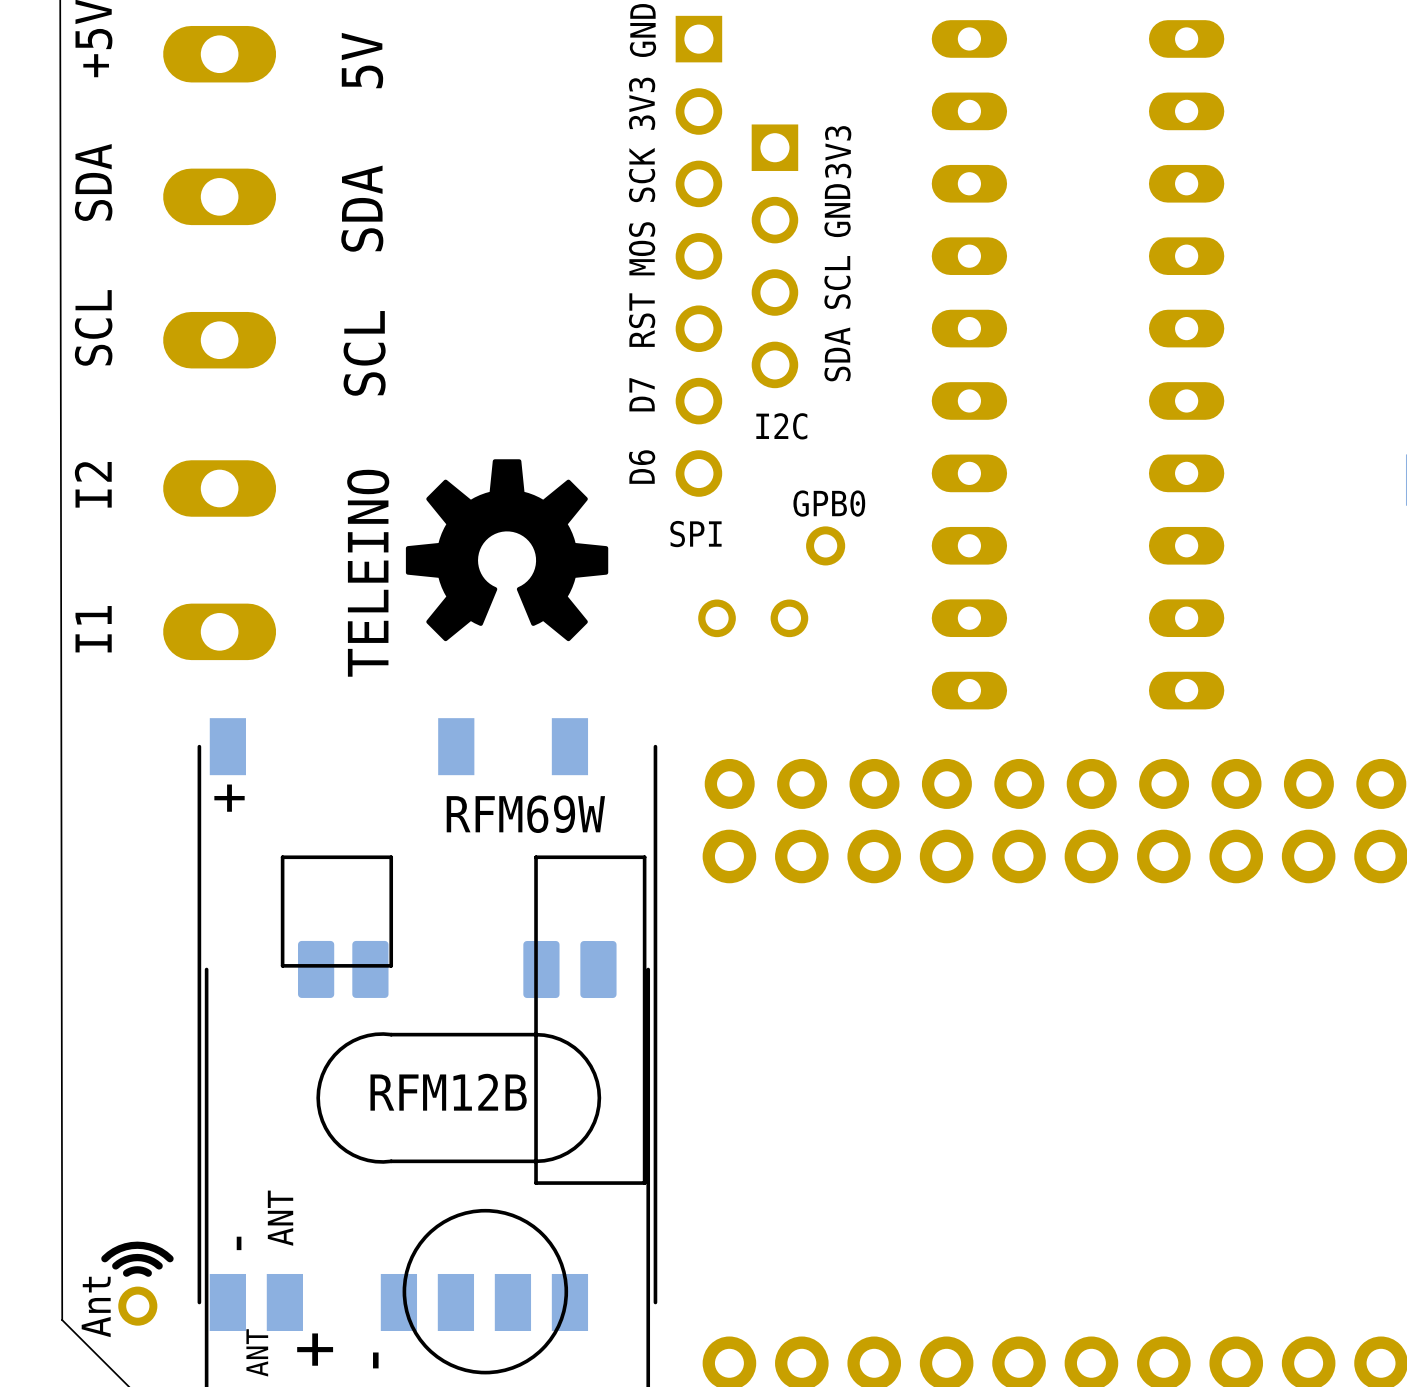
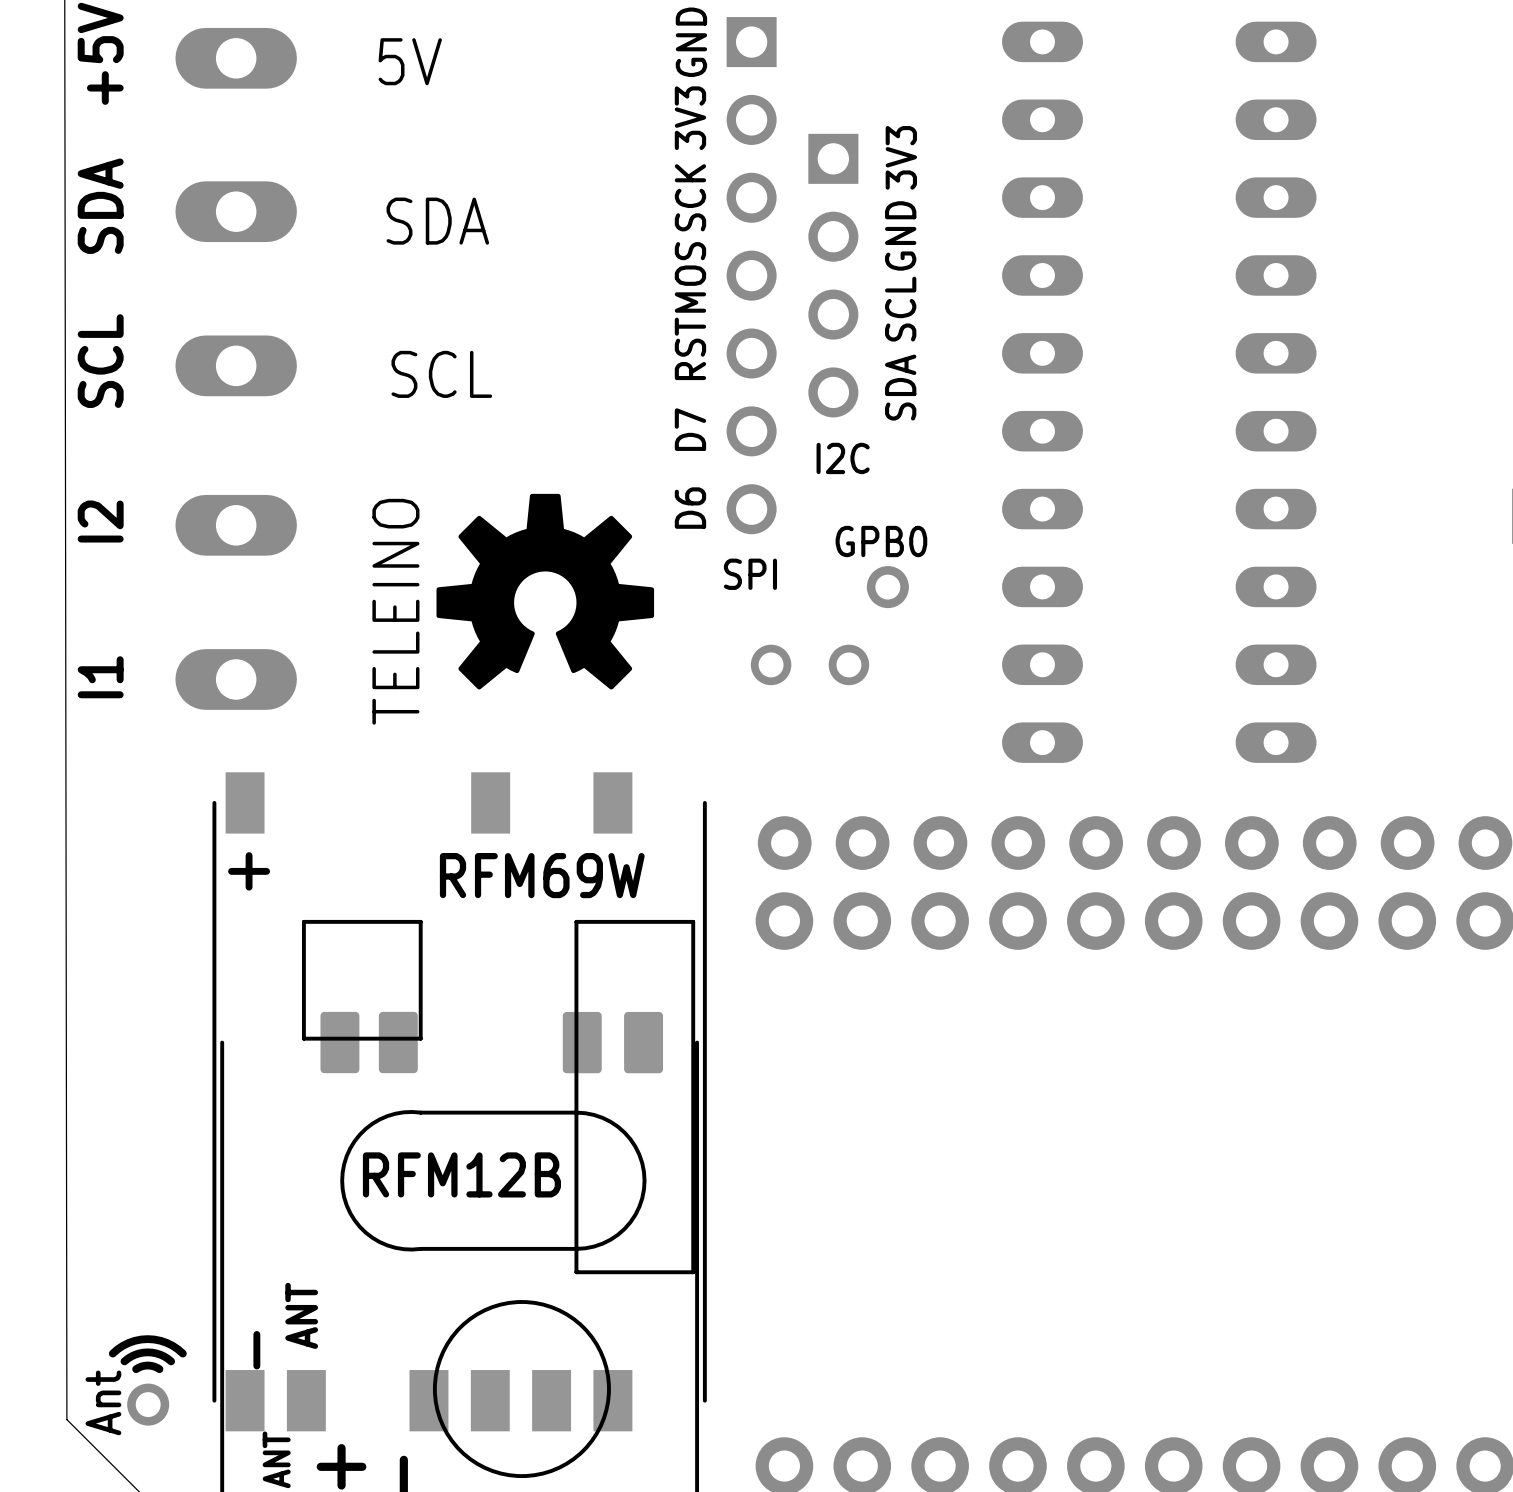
text rotation: 0° (362, 60) -> 90° clockwise (410, 61)
text rotation: 0° (362, 208) -> 90° clockwise (437, 221)
text rotation: 0° (364, 353) -> 90° clockwise (441, 374)

